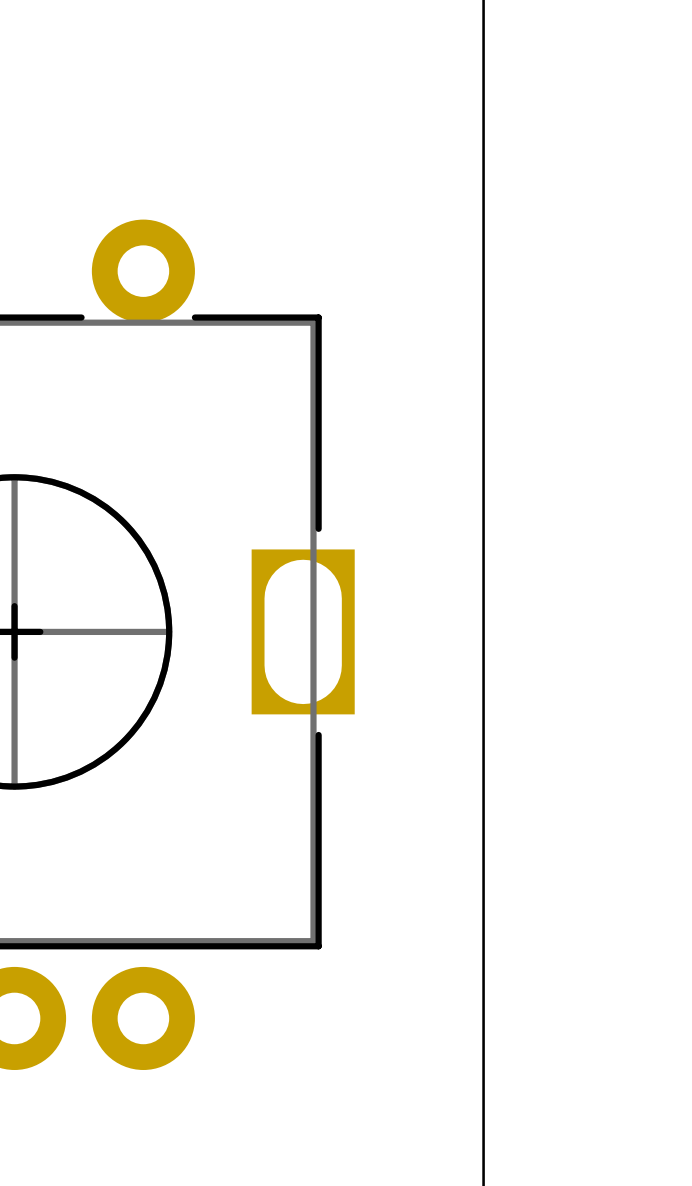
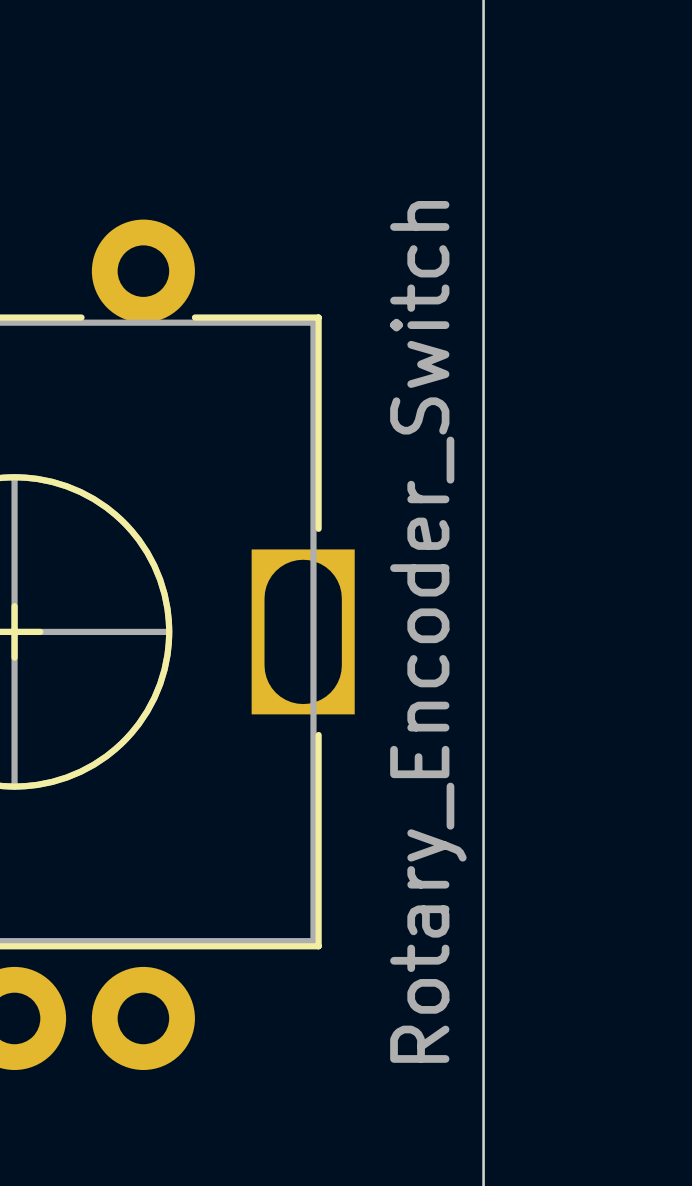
part value: none -> Rotary_Encoder_Switch (428, 631)

